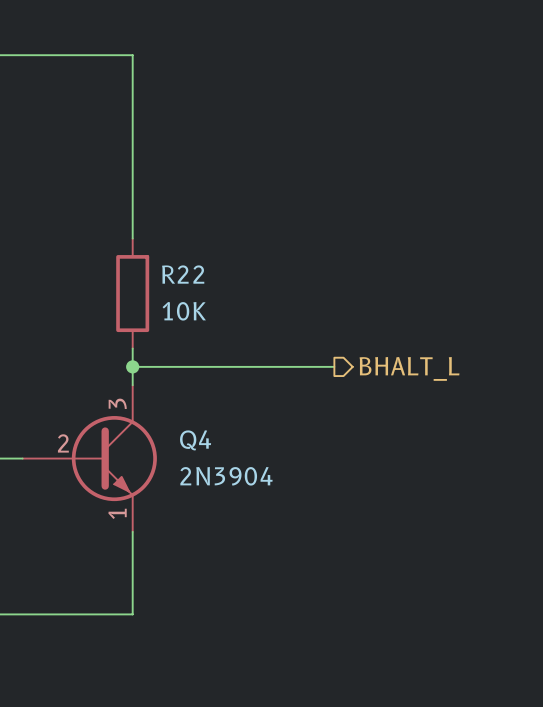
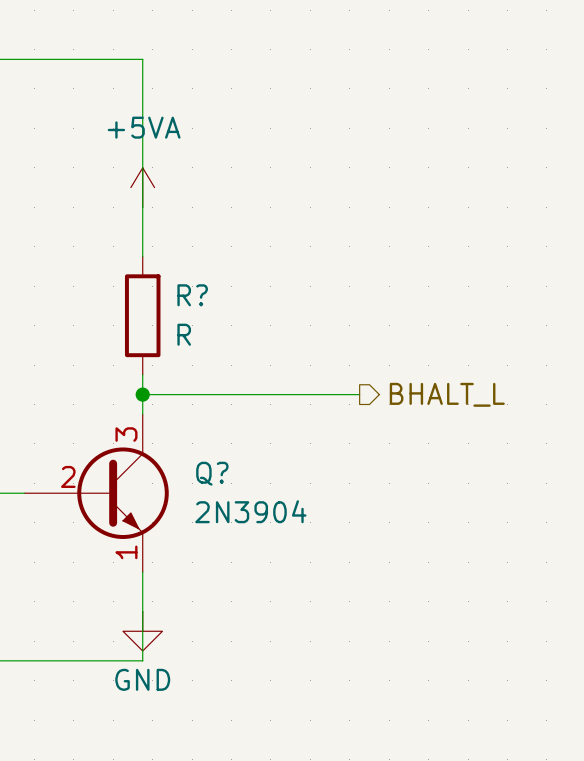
power symbol: none -> +5VA (142, 187)
R22 name: R22 (183, 274) -> R? (192, 295)
R22 value: 10K (184, 311) -> R (184, 334)
Q4 name: Q4 (195, 440) -> Q? (212, 473)
power symbol: none -> GND (142, 631)

